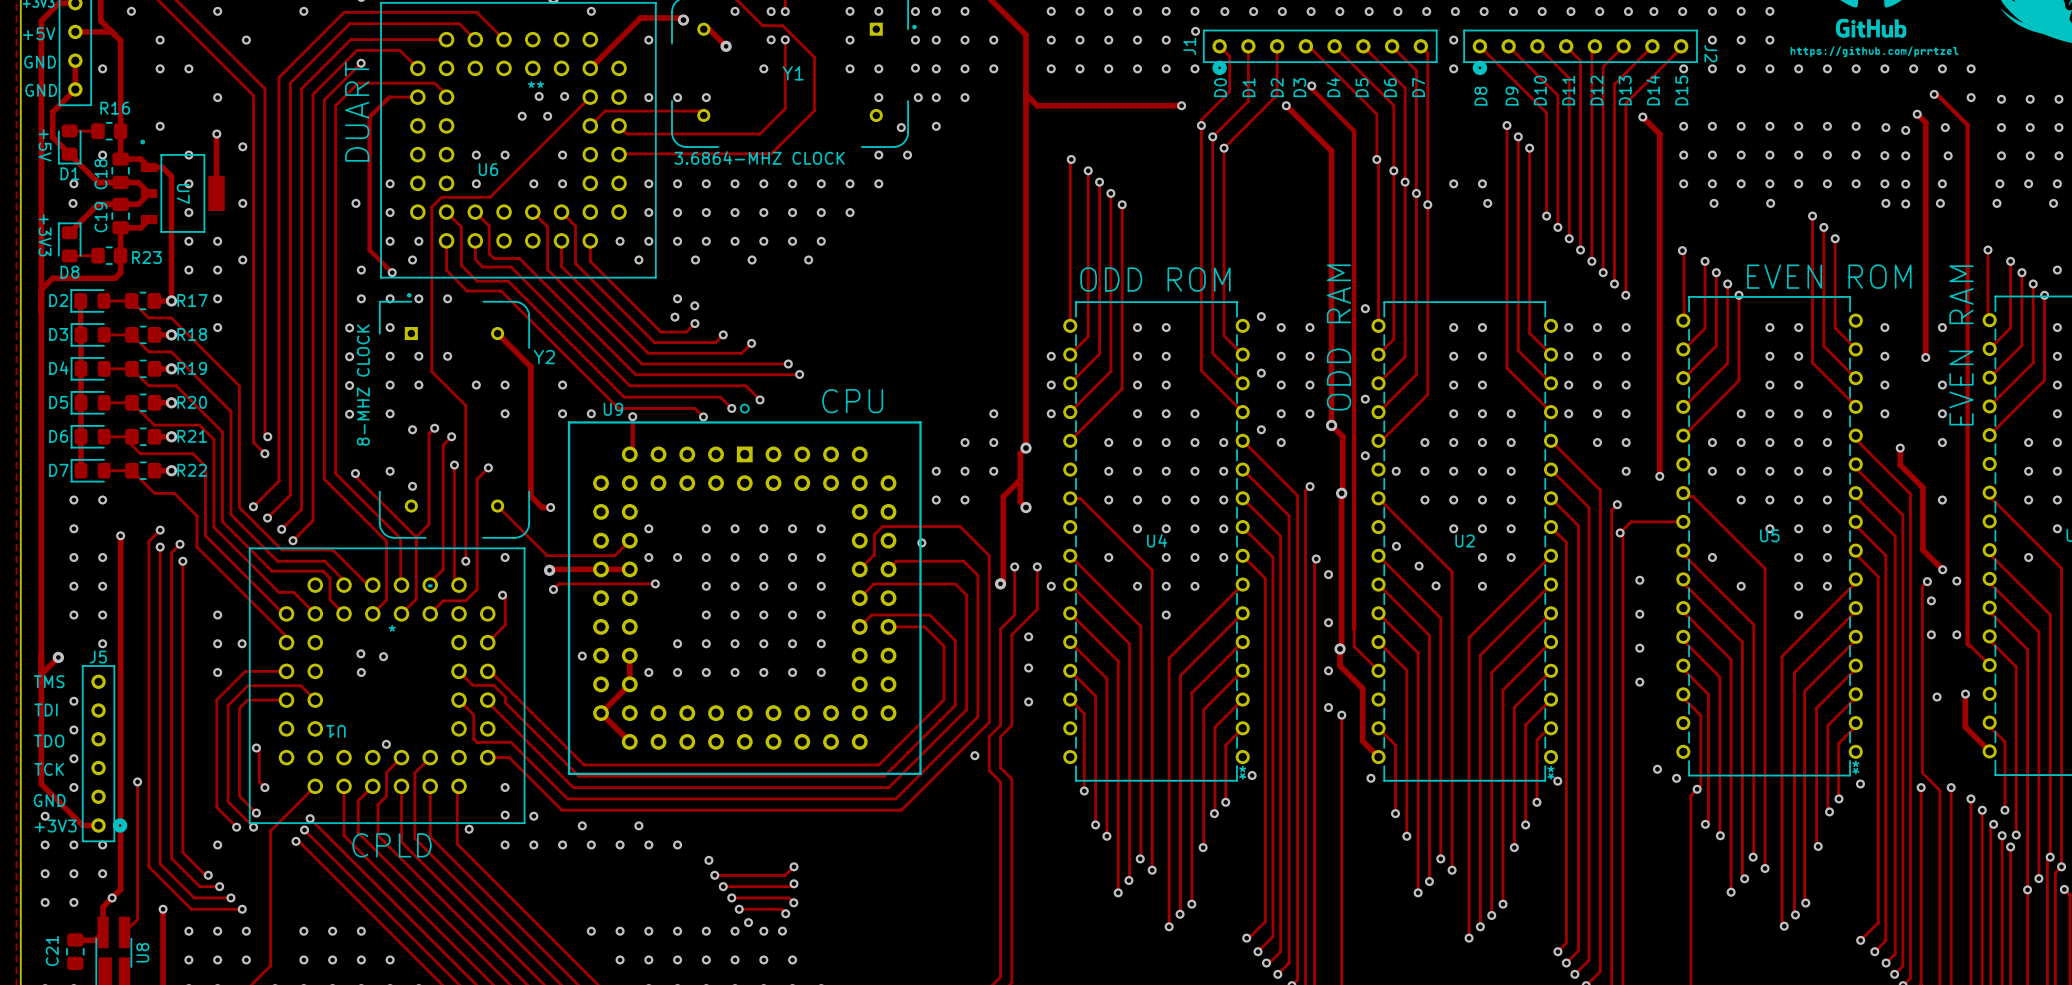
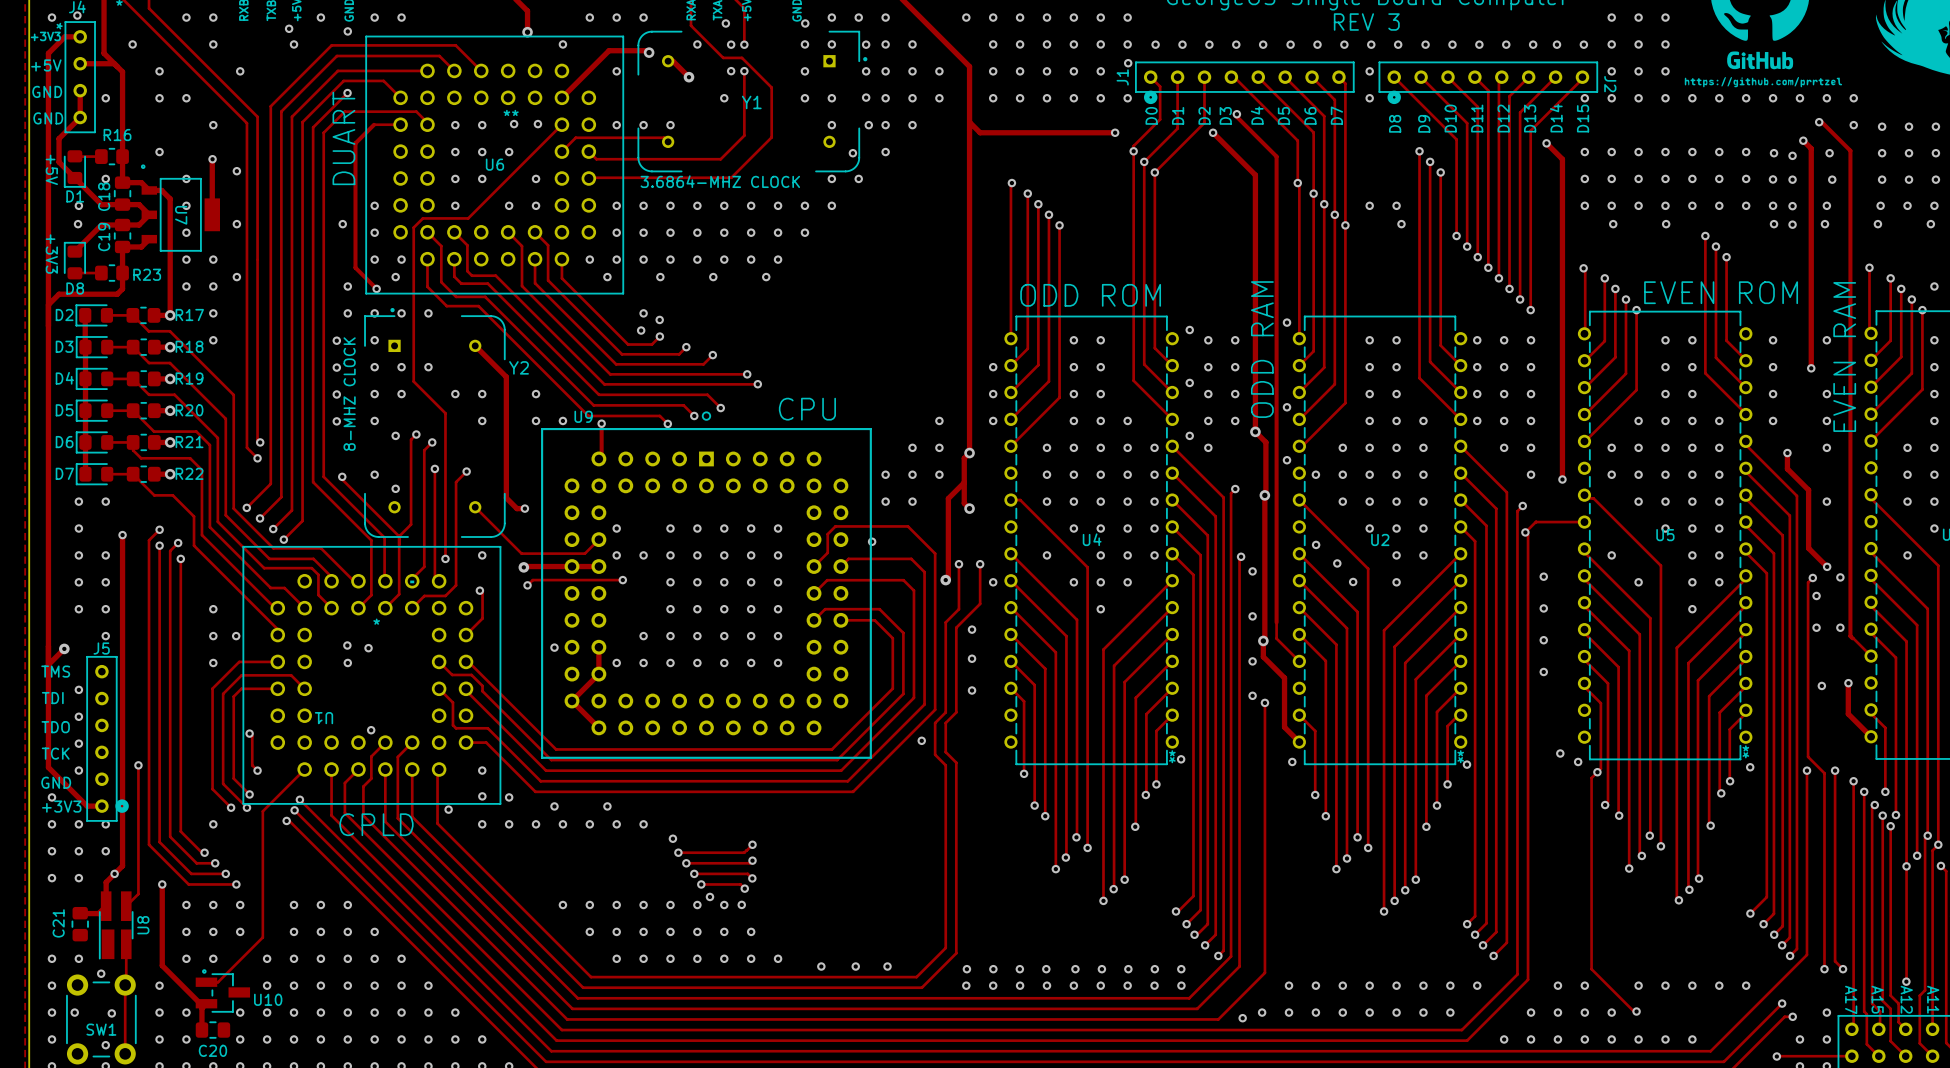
via: none -> (455, 125)
via: none -> (482, 125)
via: (522, 116) -> none
via: (547, 116) -> none
via: none -> (455, 152)
via: none -> (482, 152)
via: none -> (509, 152)
U6 name position: U6 (488, 169) -> U6 (494, 164)

